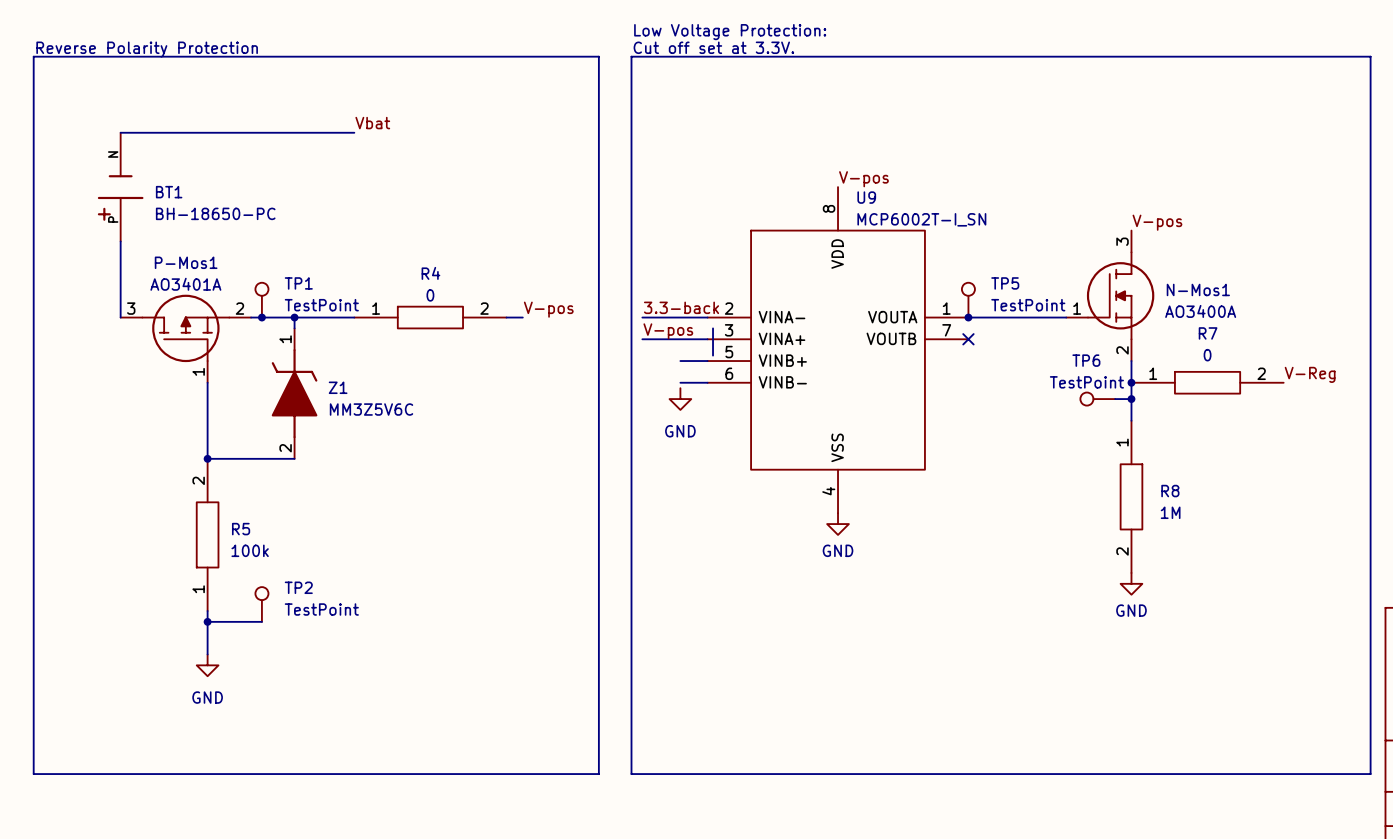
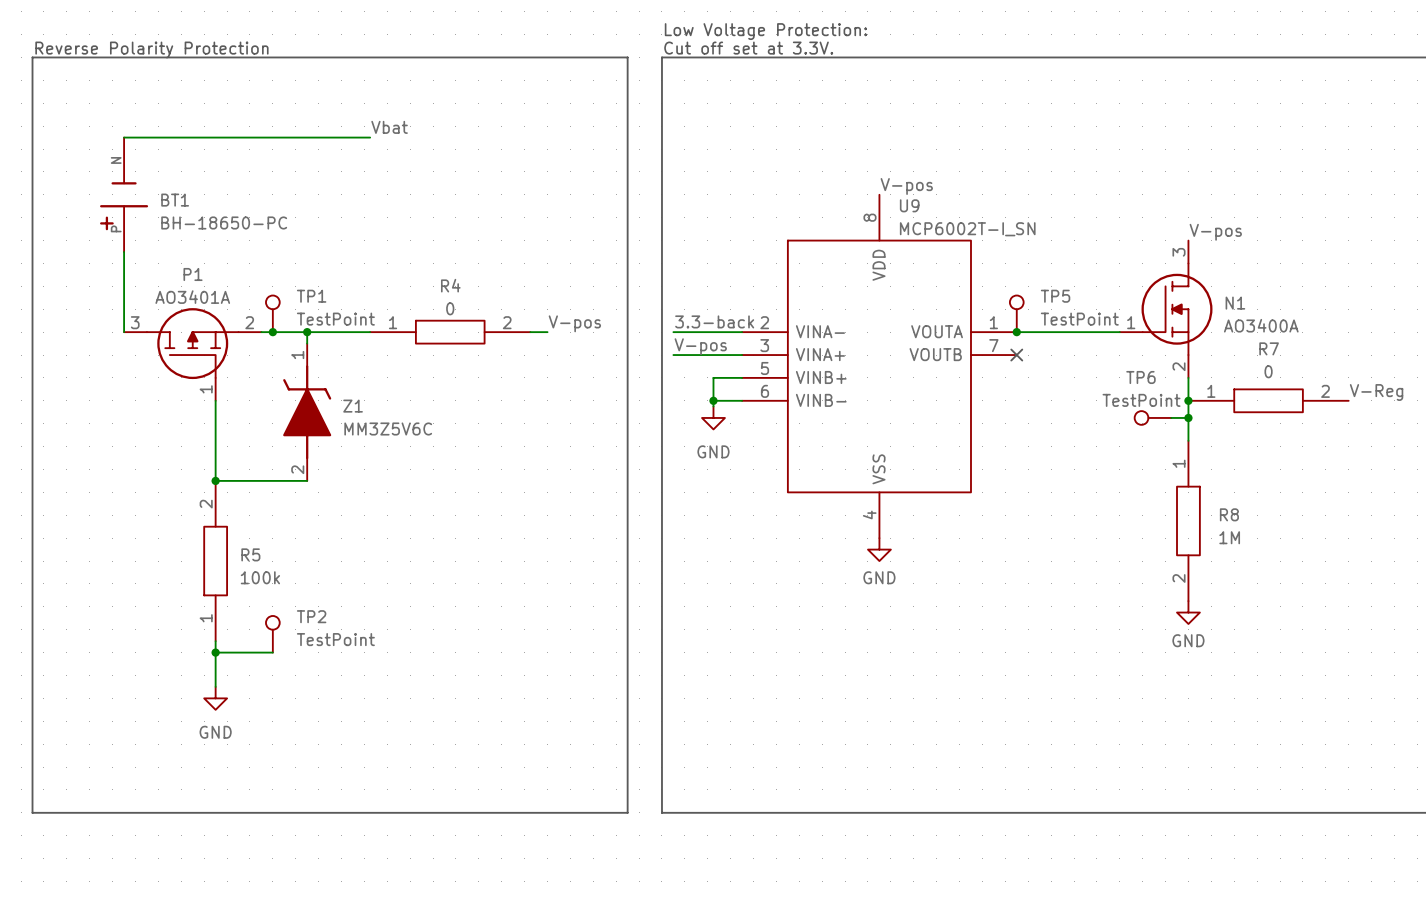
P-Mos1 name: P-Mos1 (186, 262) -> P1 (193, 274)
N-Mos1 name: N-Mos1 (1198, 289) -> N1 (1235, 303)
wire: (713, 328) (713, 355) -> (713, 377) (713, 406)
junction: none -> (713, 400)

